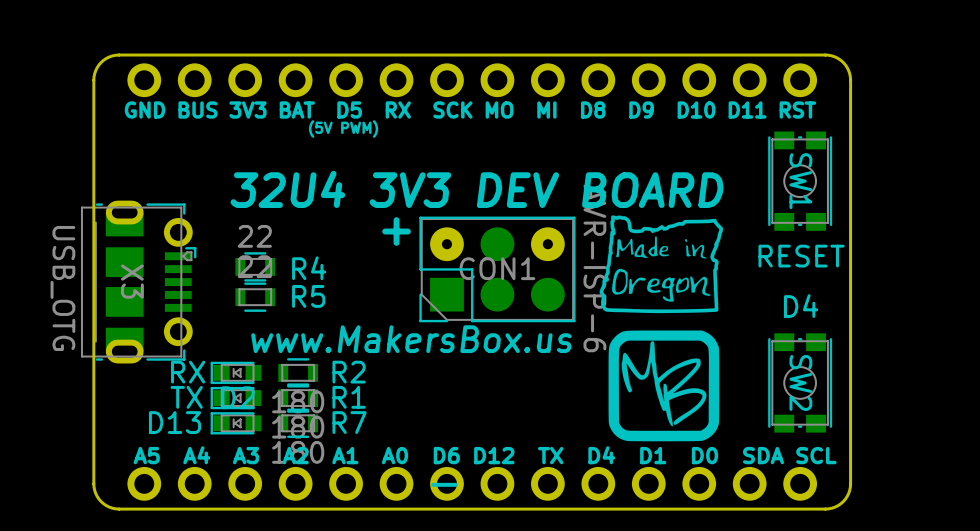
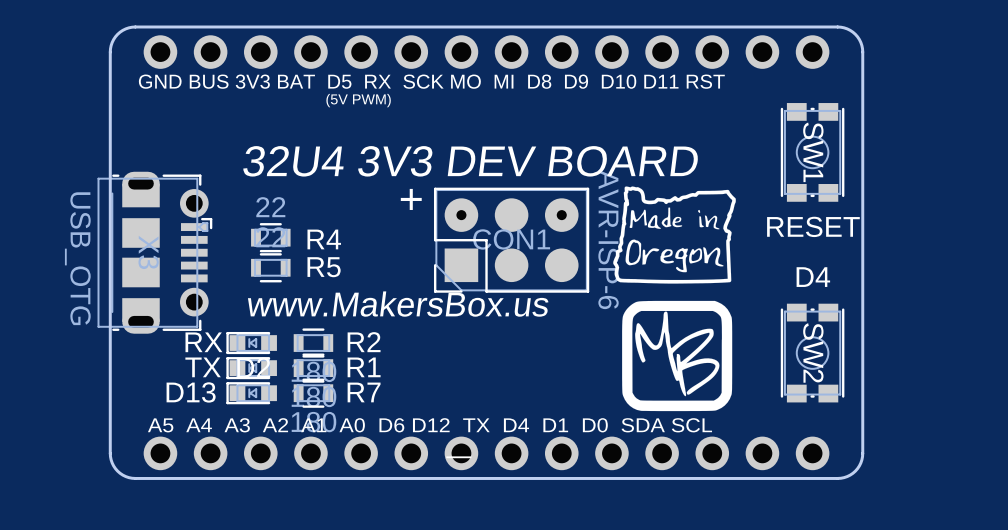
text position: www.MakersBox.us (411, 339) -> www.MakersBox.us (398, 304)

